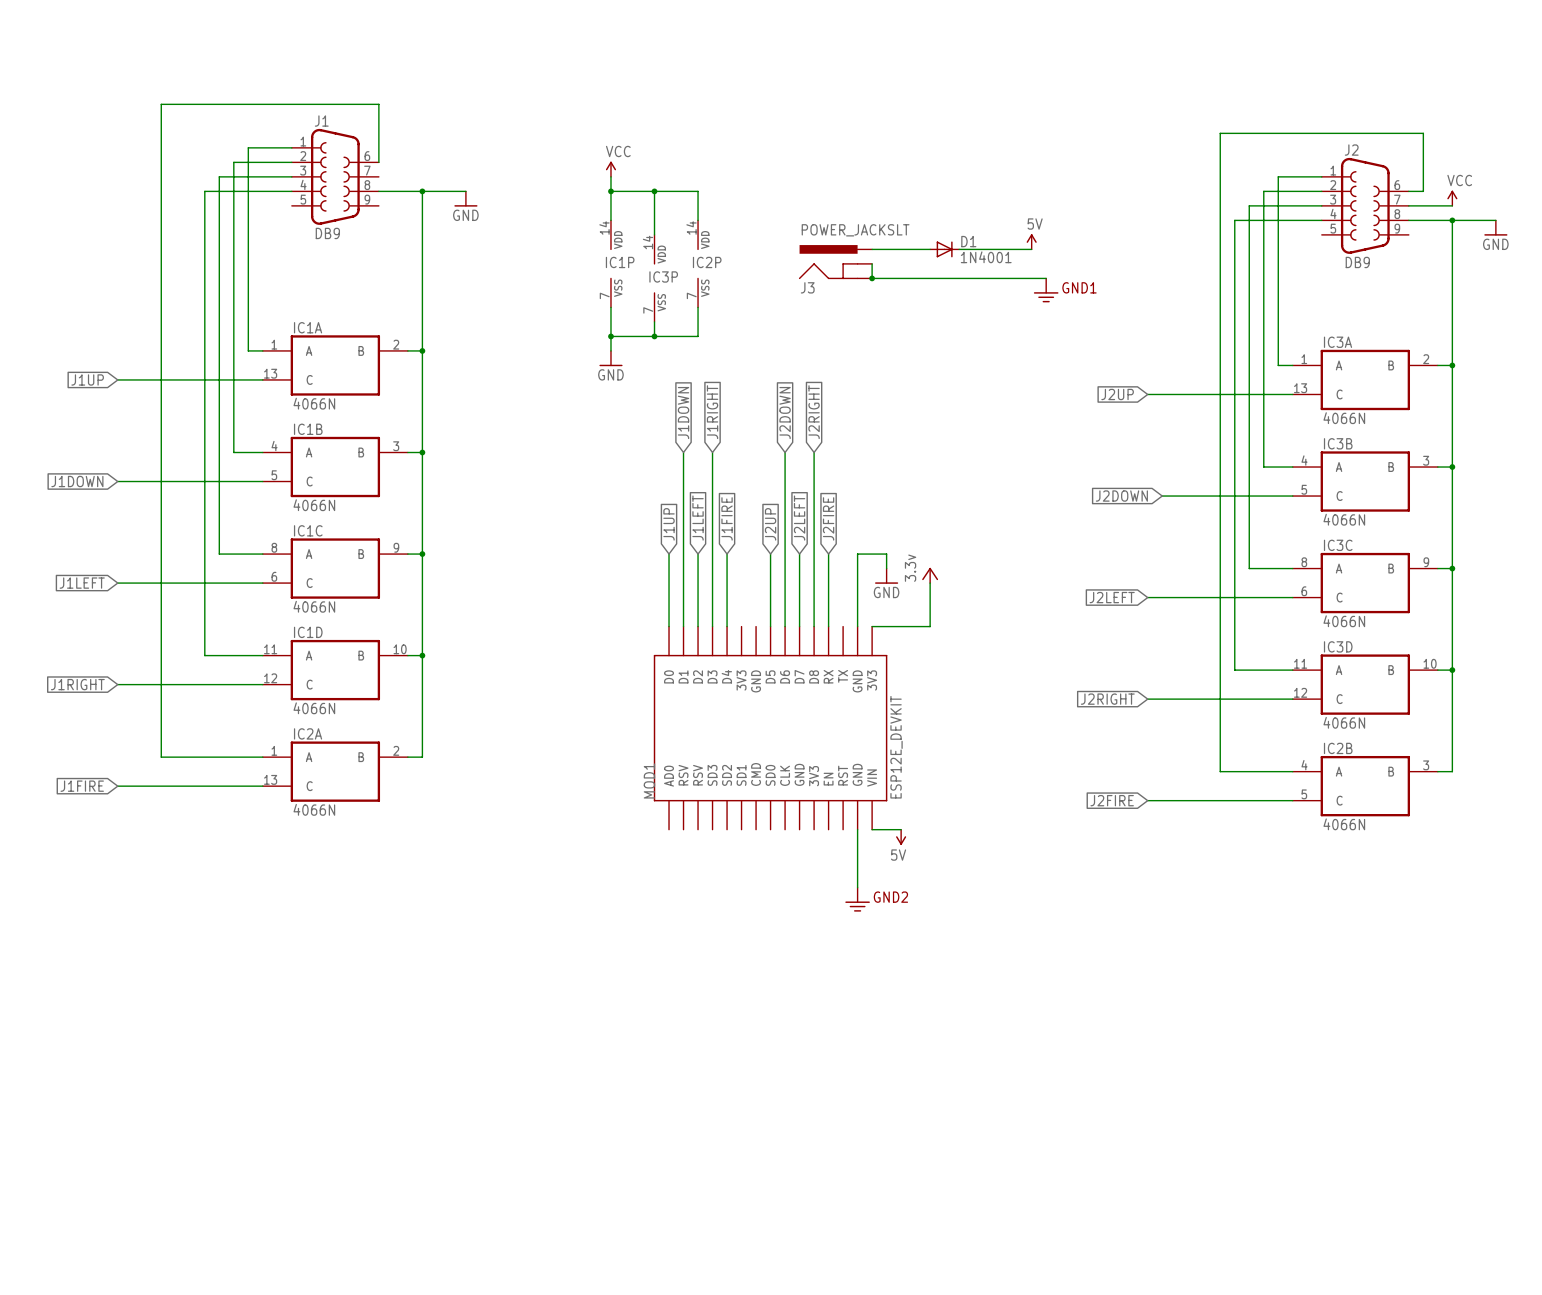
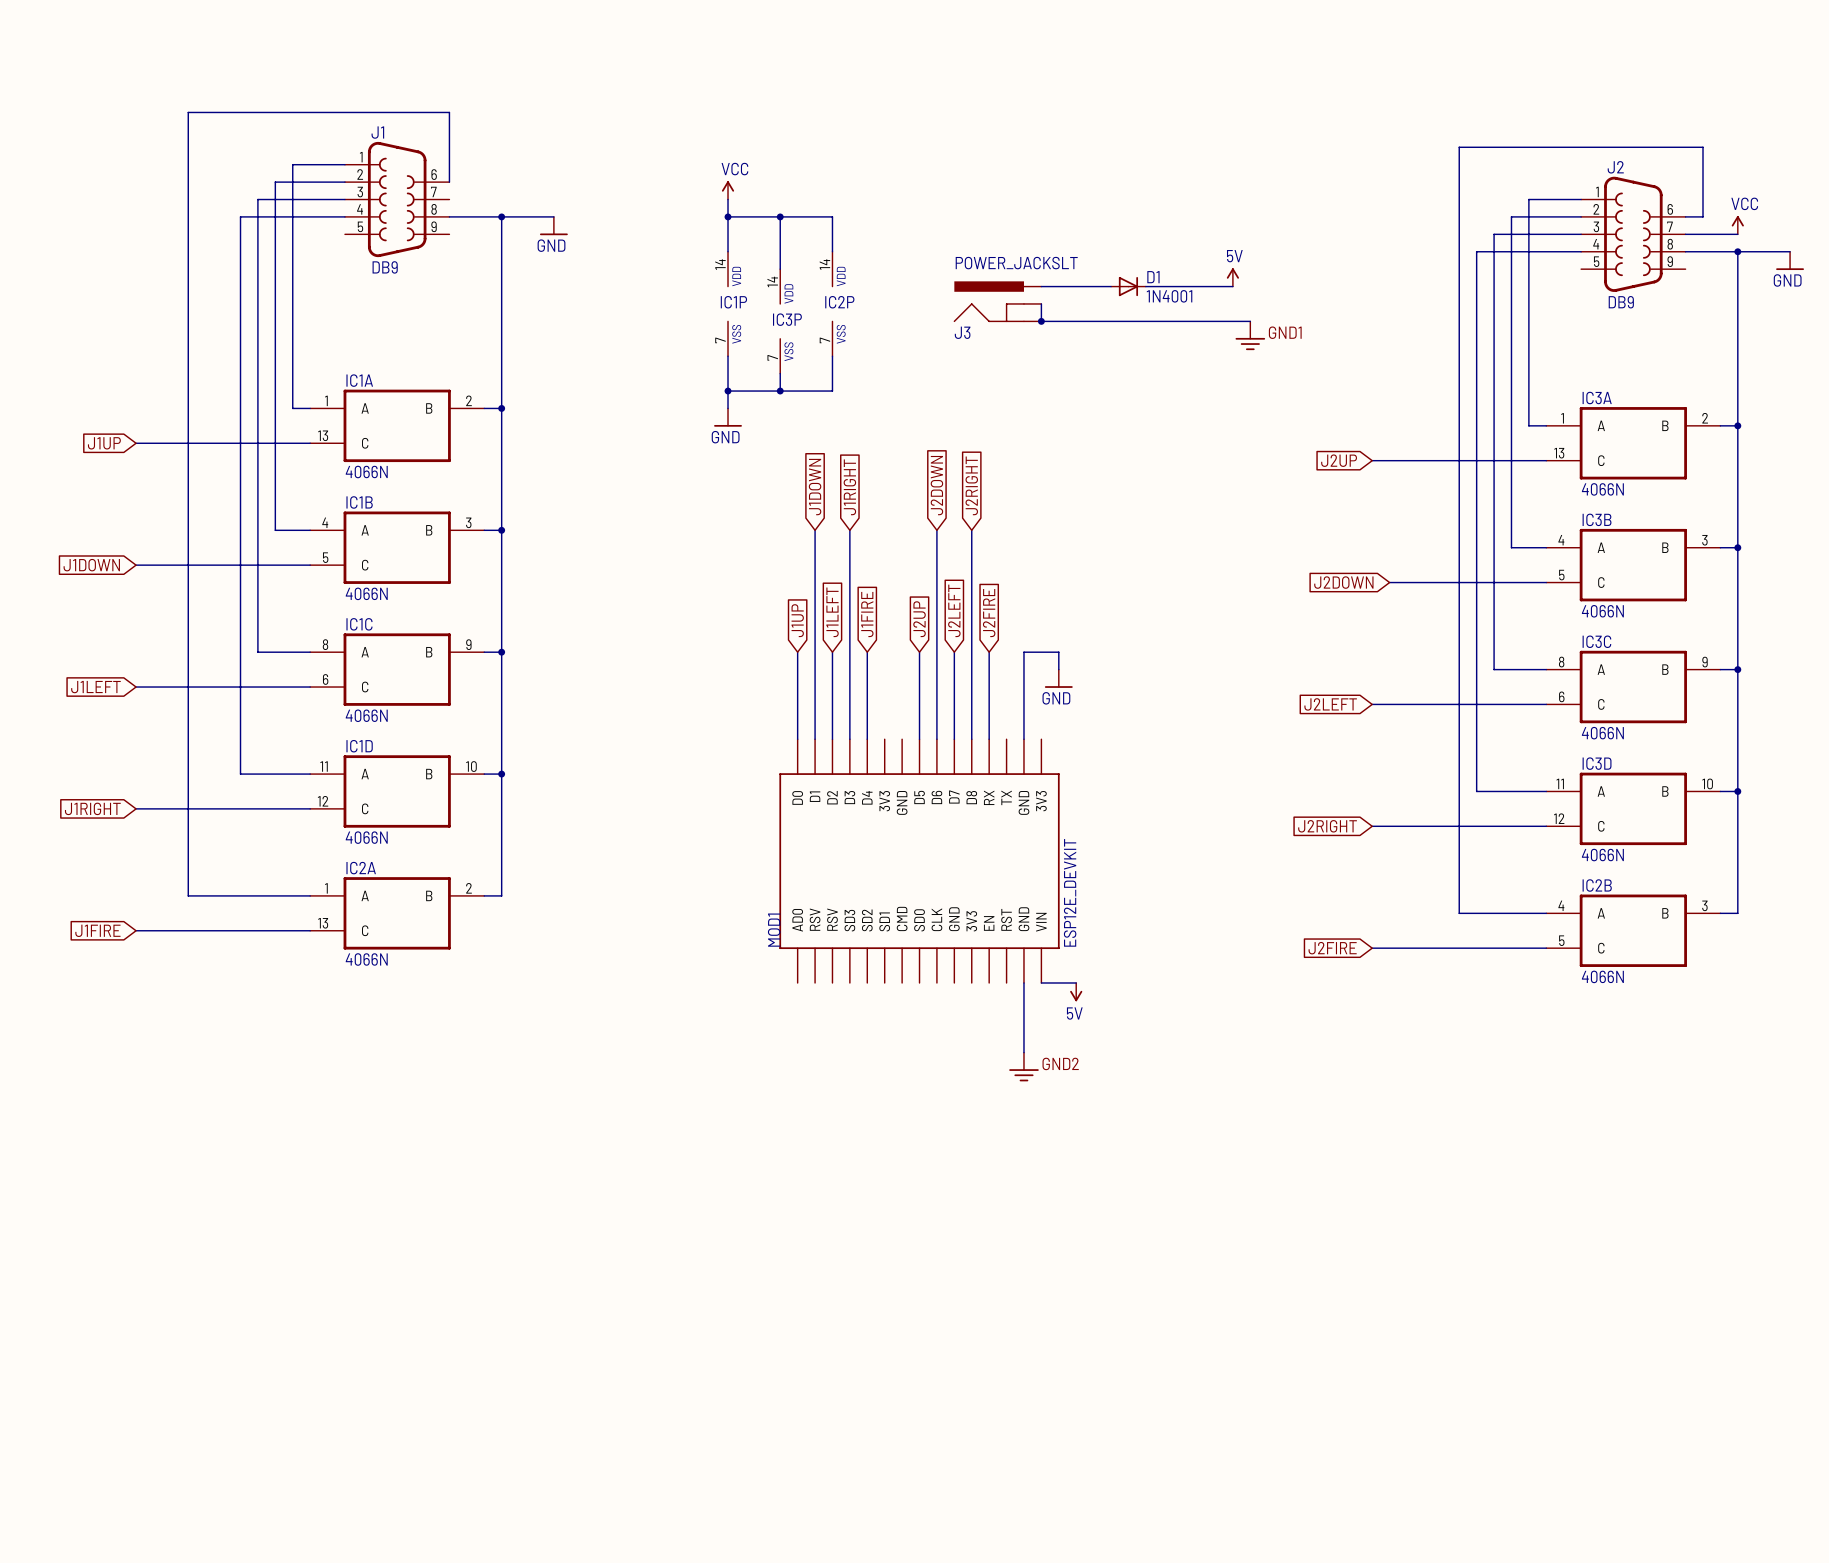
power symbol: 3.3v (930, 575) -> none
wire: (930, 583) (930, 626) (872, 626) -> none

